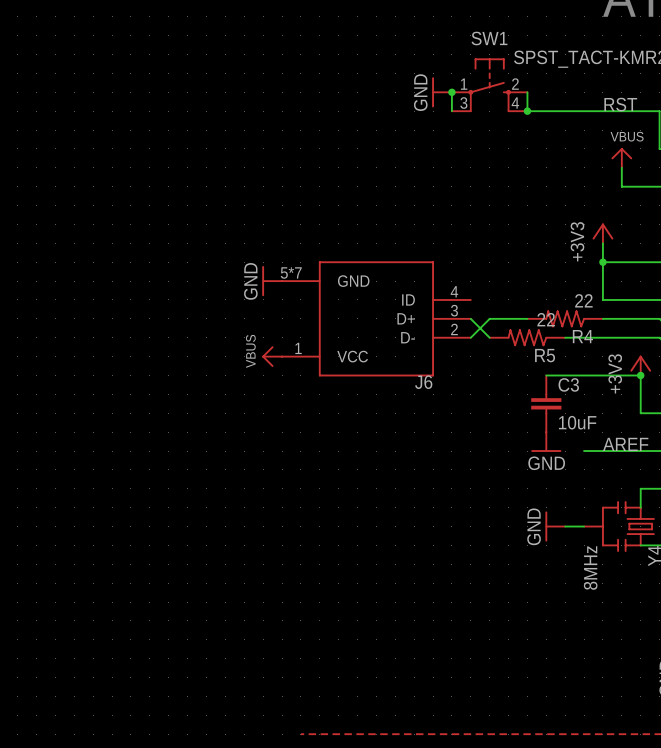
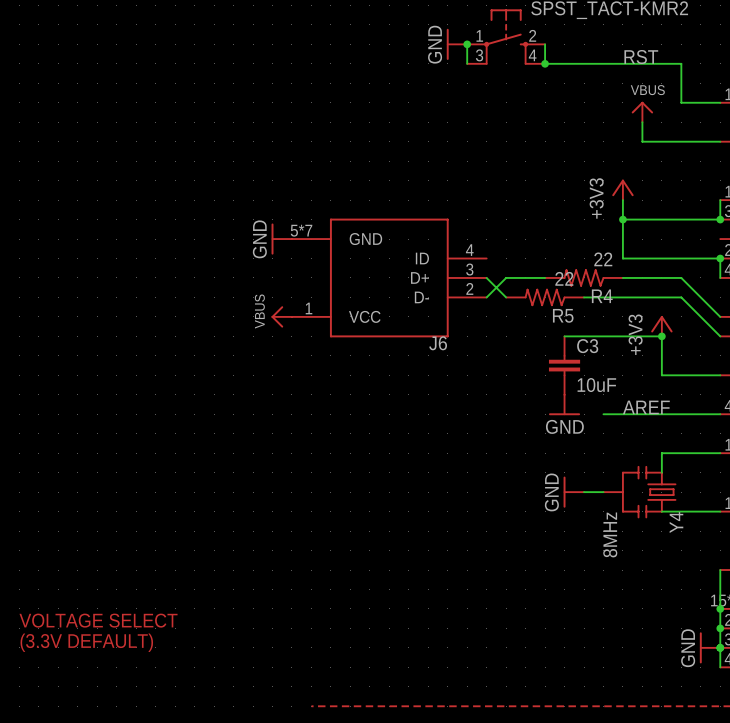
text: none -> VOLTAGE SELECT (98, 620)
text: none -> (3.3V DEFAULT) (86, 642)

